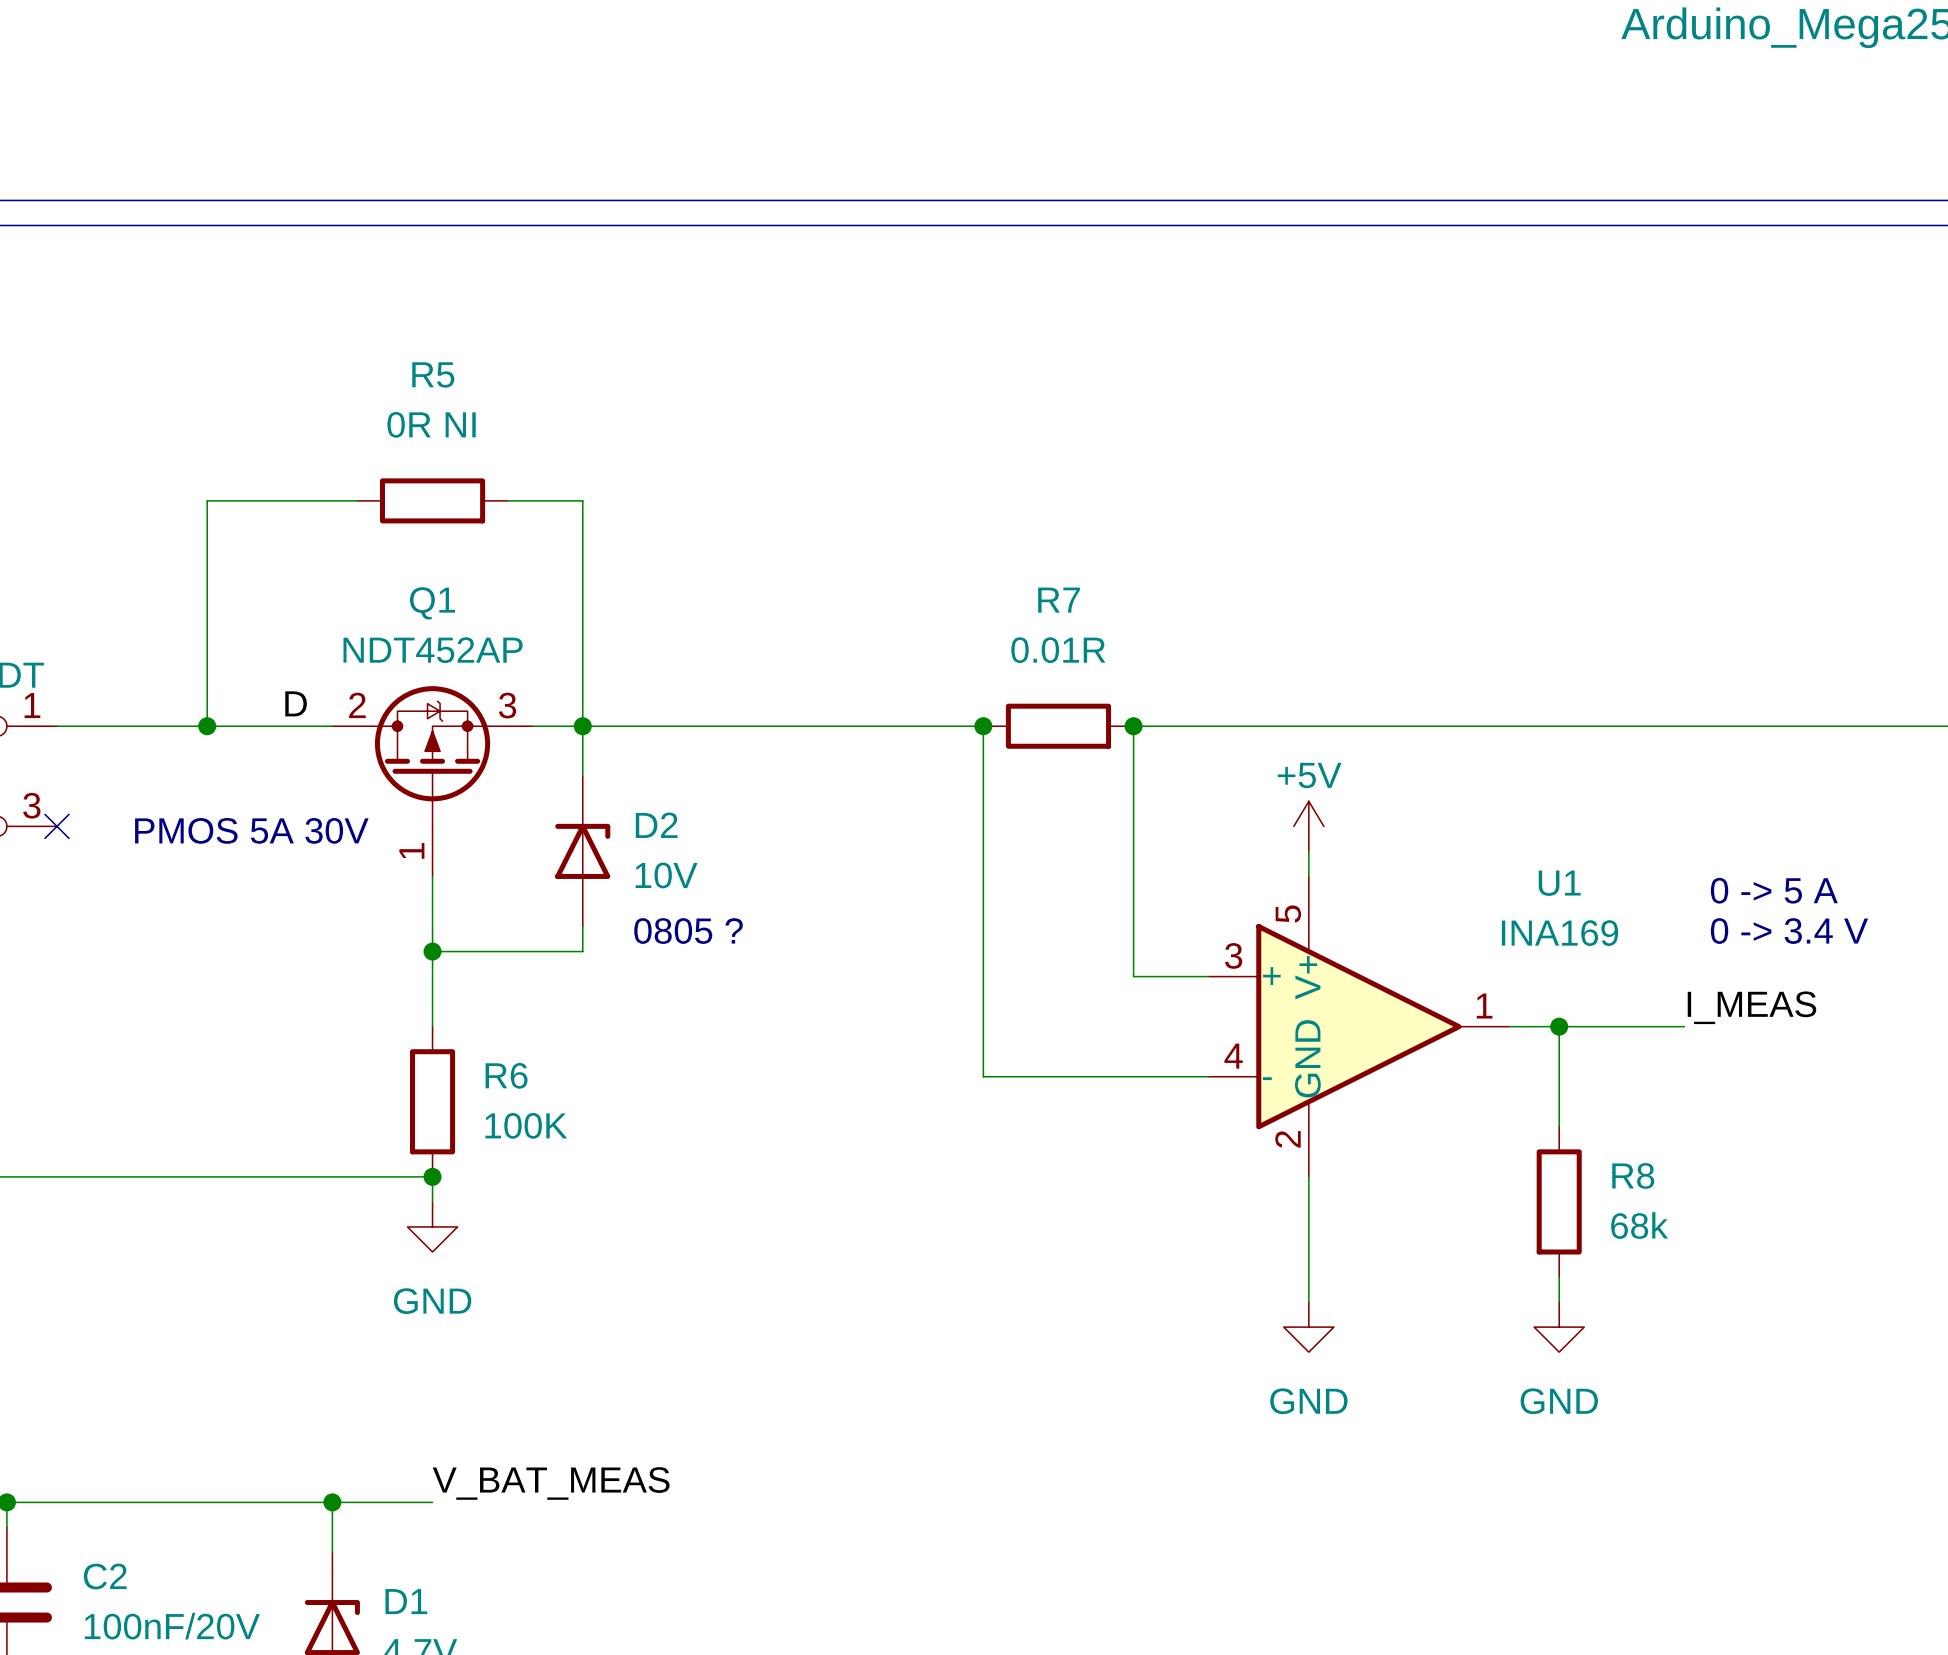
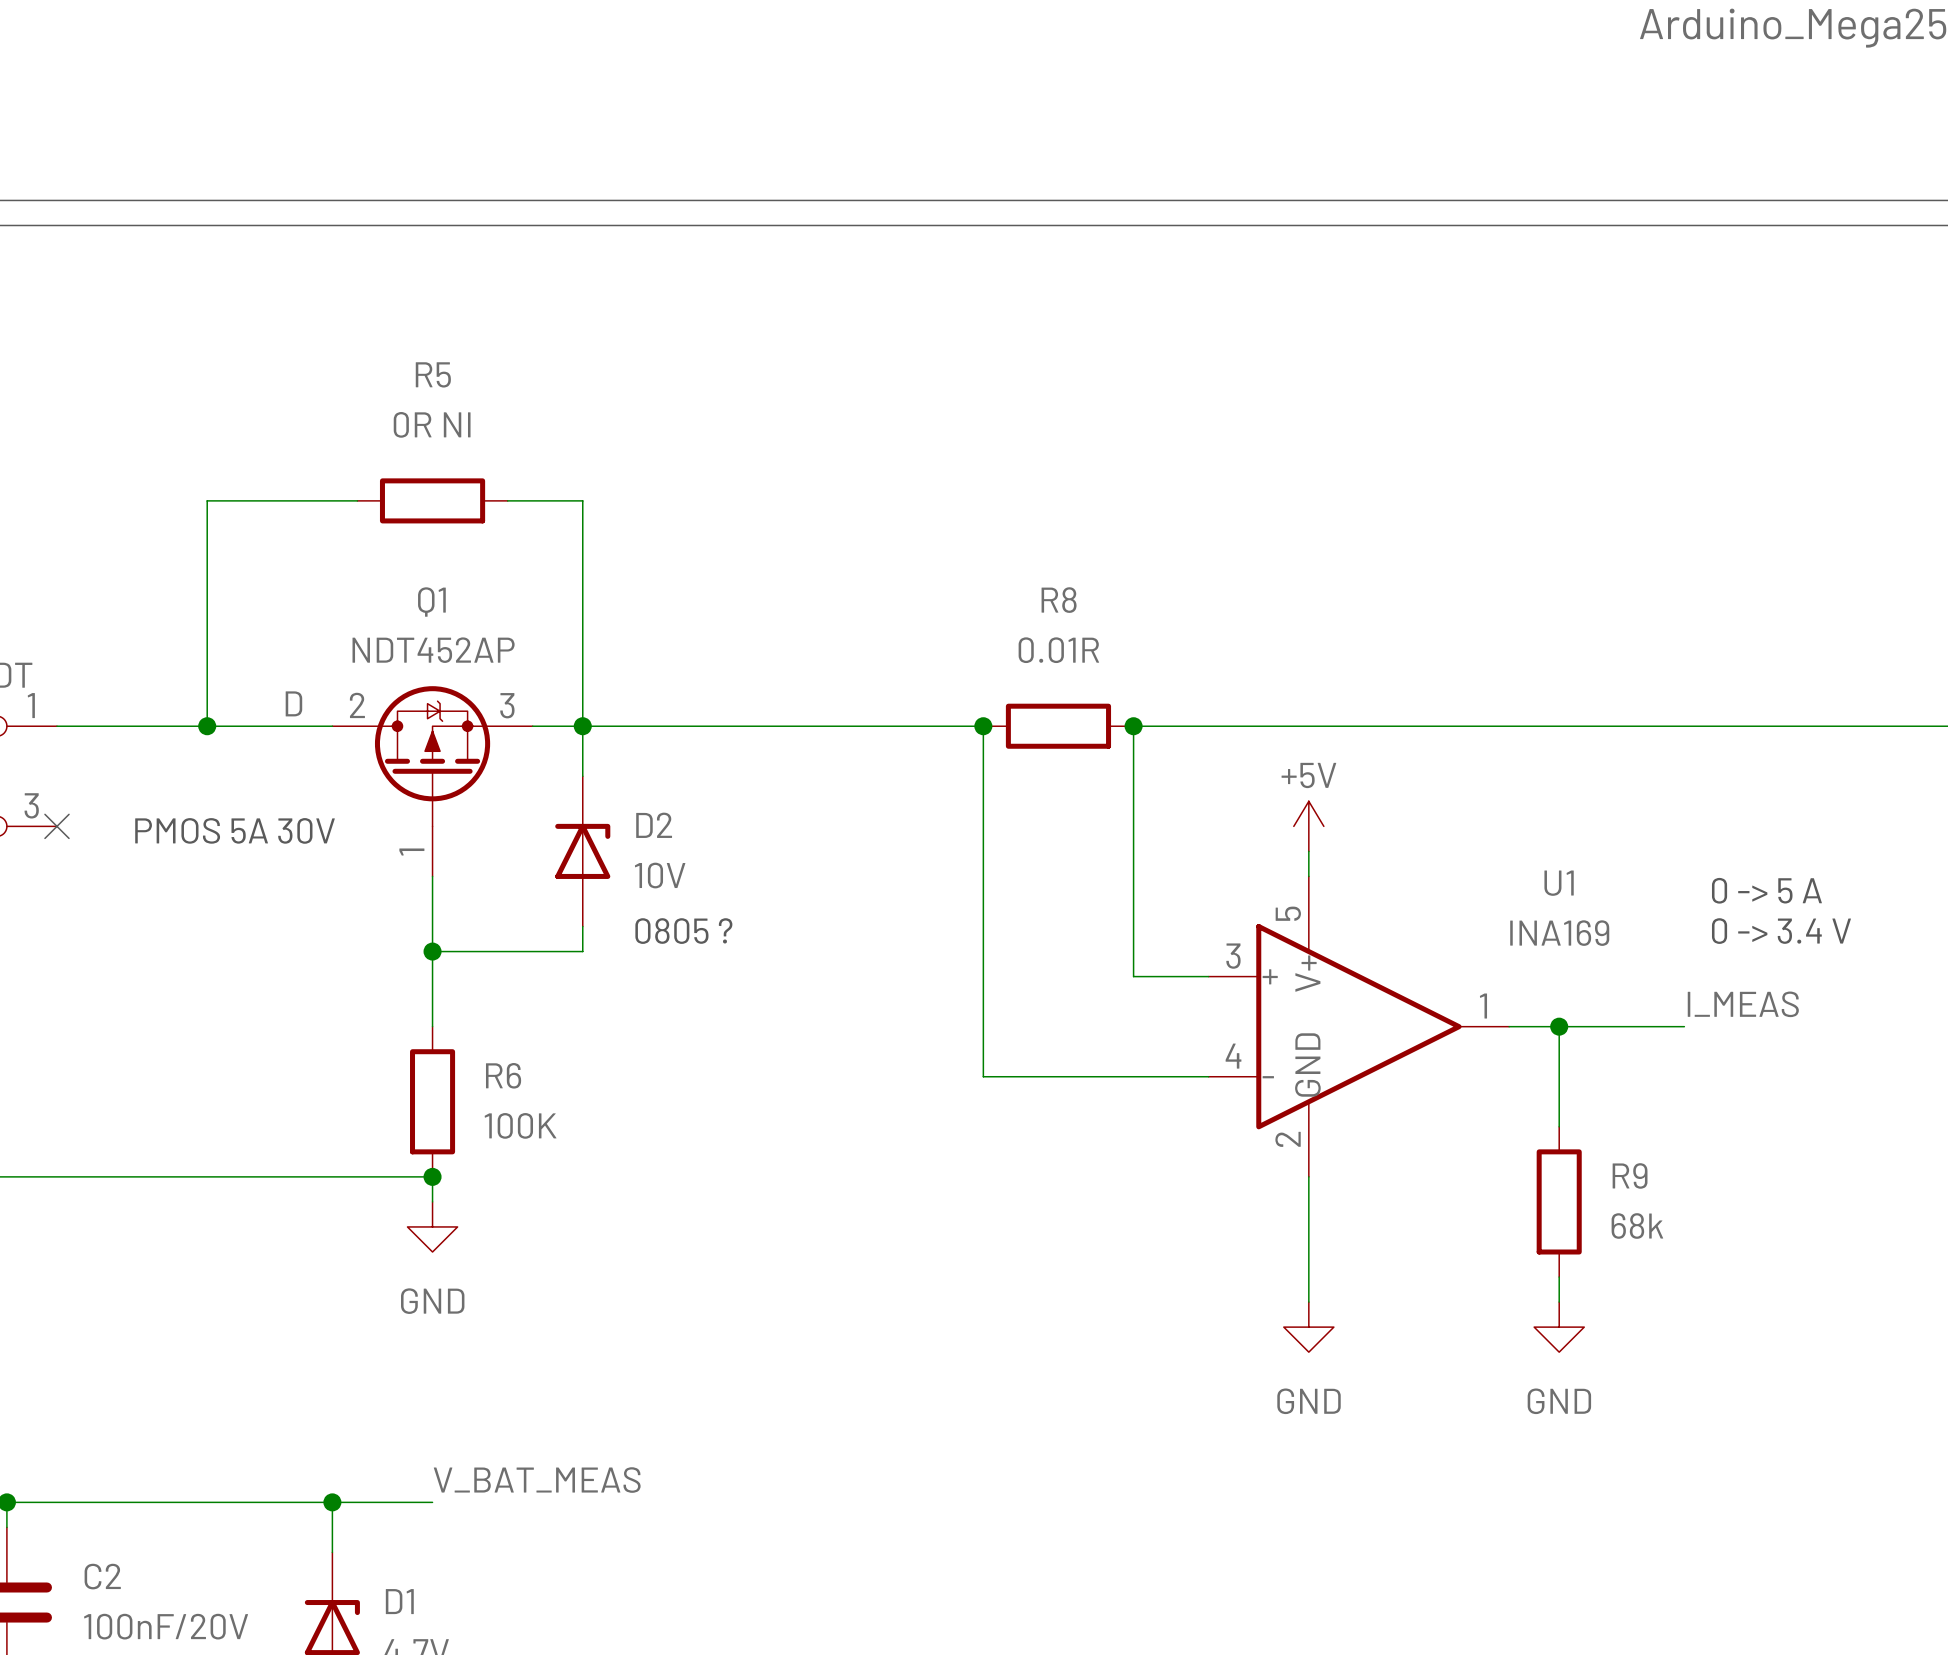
R7 name: R7 (1059, 600) -> R8 (1059, 600)
R8 name: R8 (1633, 1175) -> R9 (1630, 1175)

